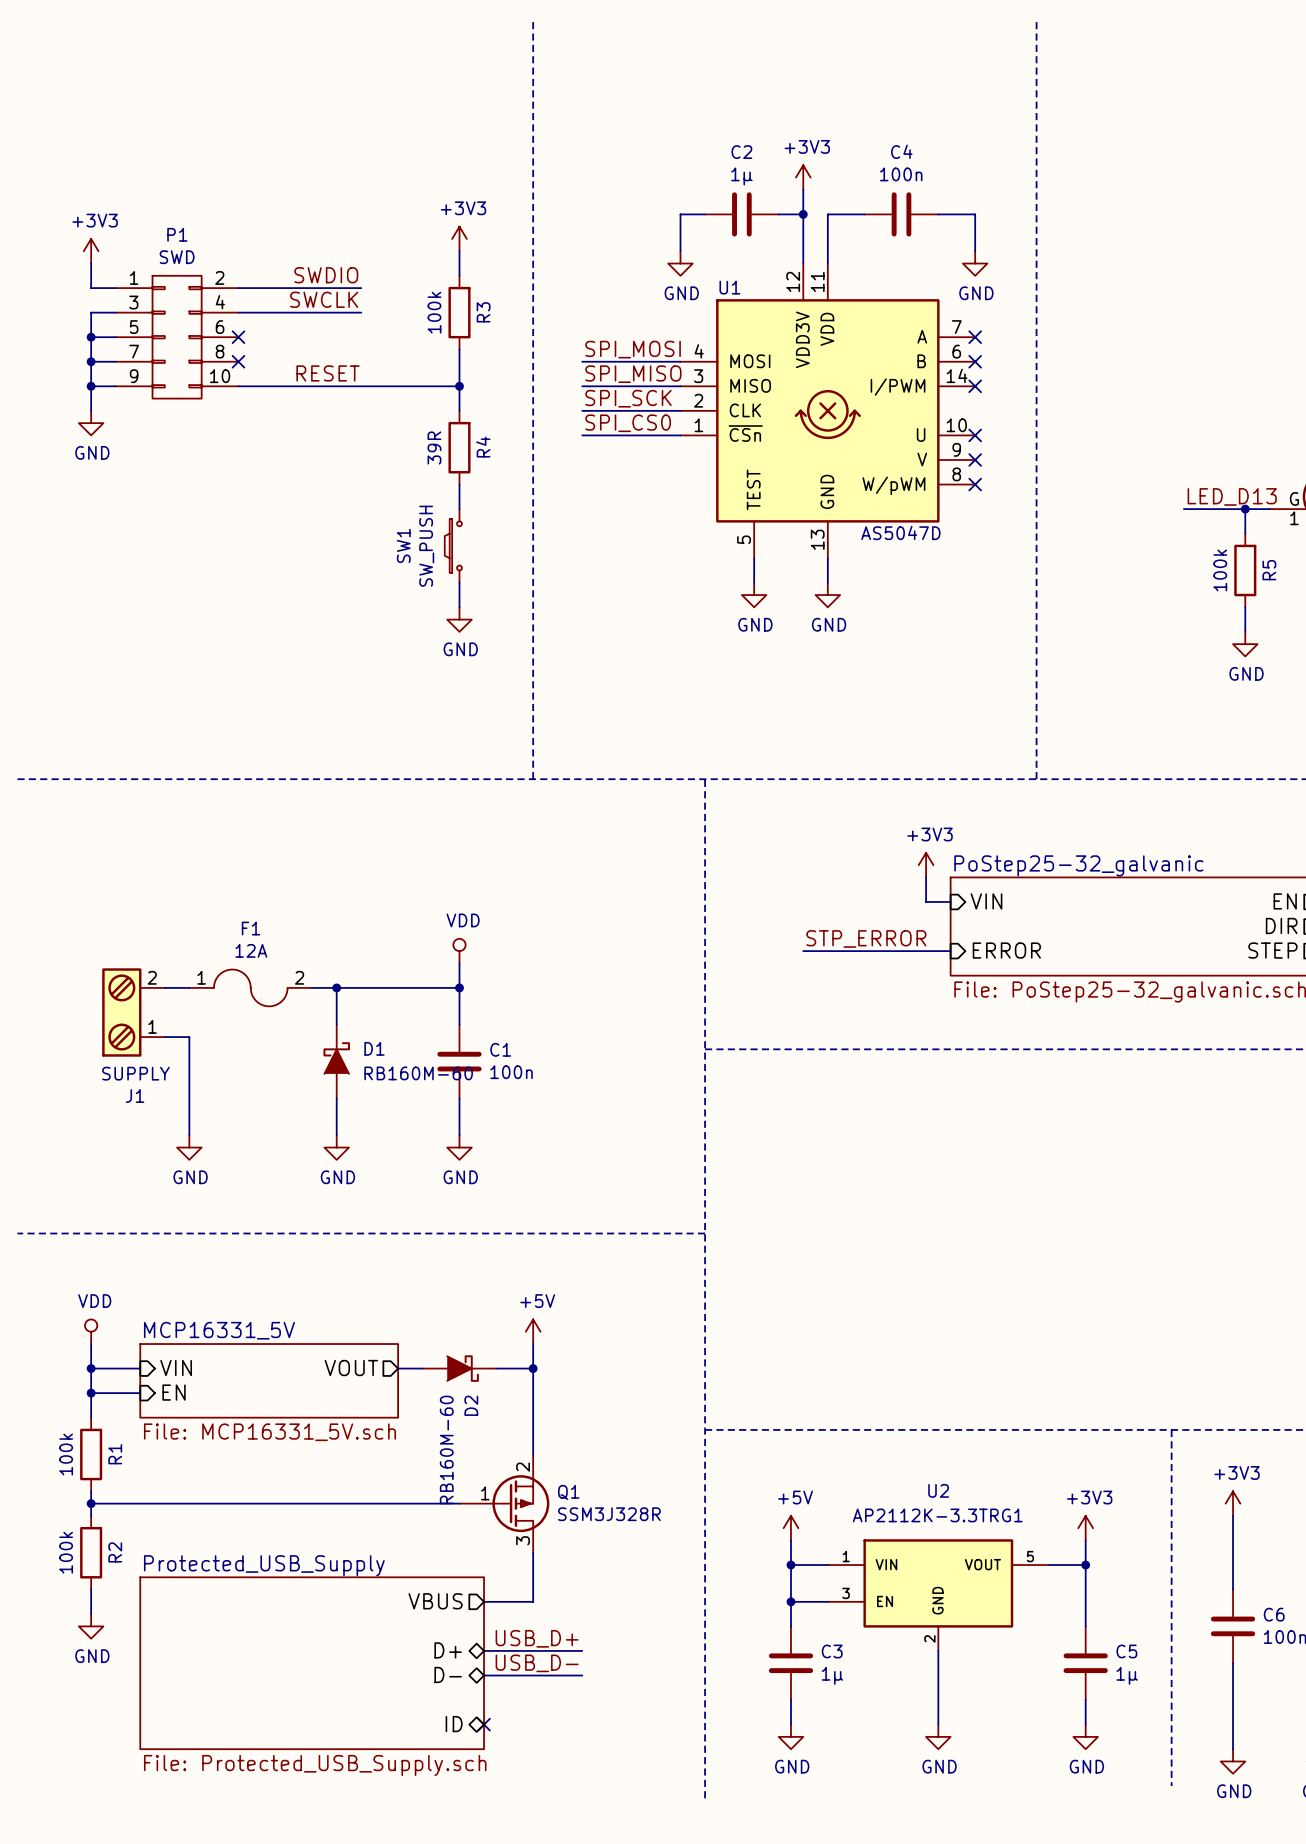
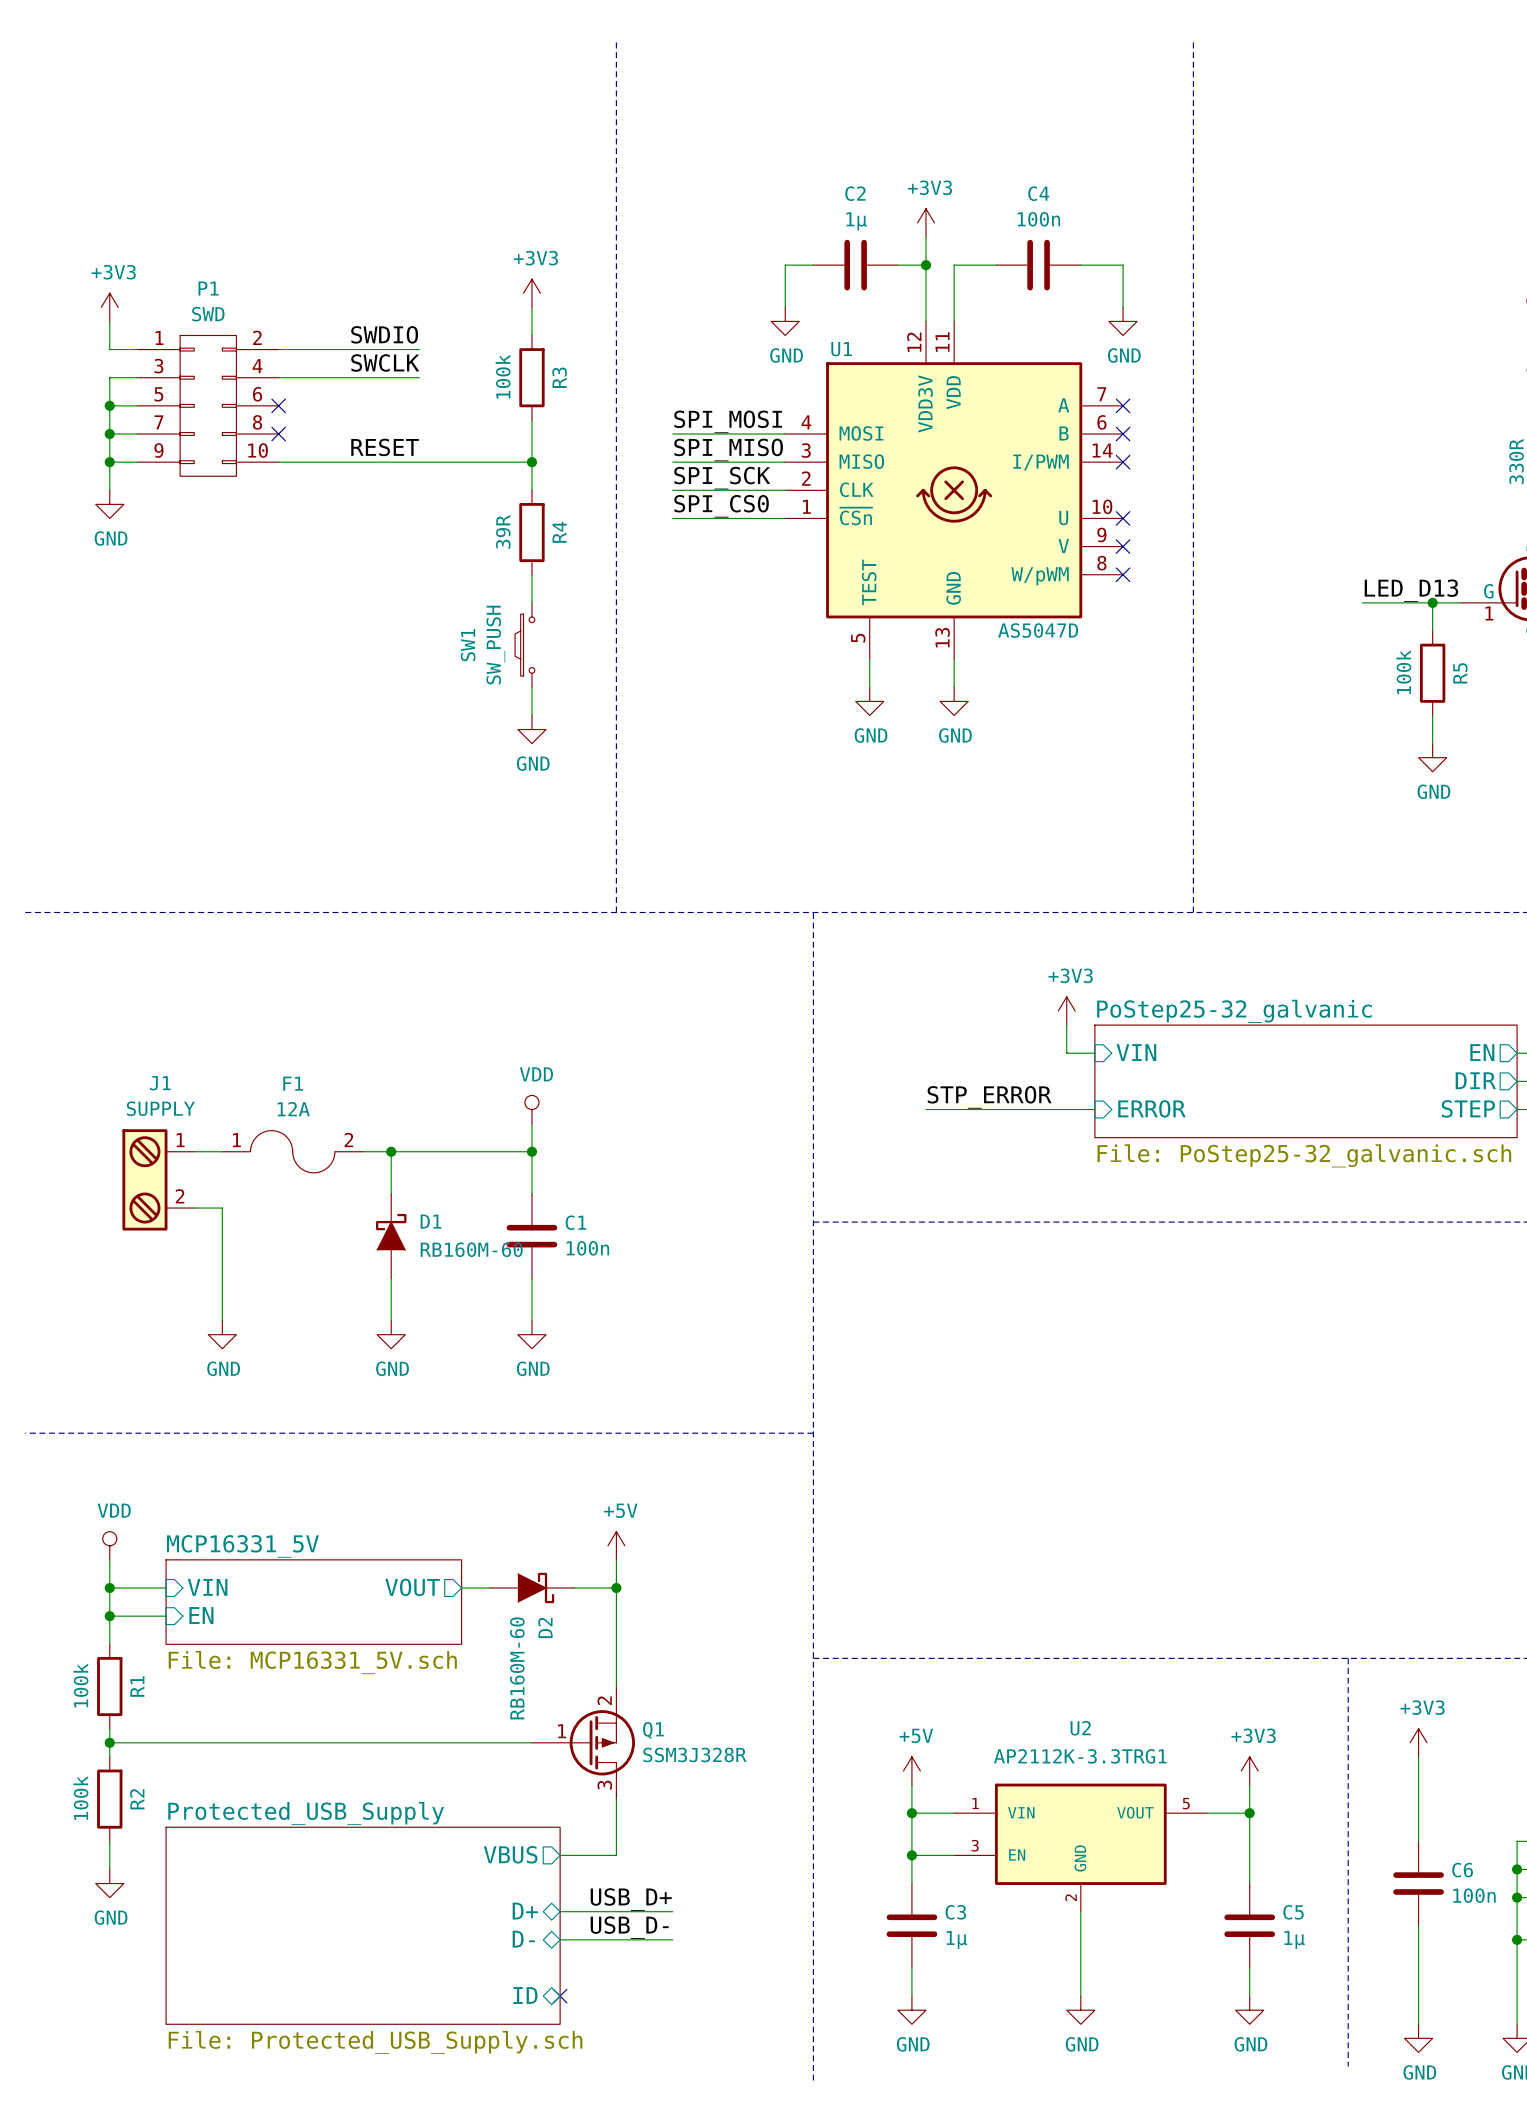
J1 flip: as is (121, 1012) -> up-down (144, 1179)

